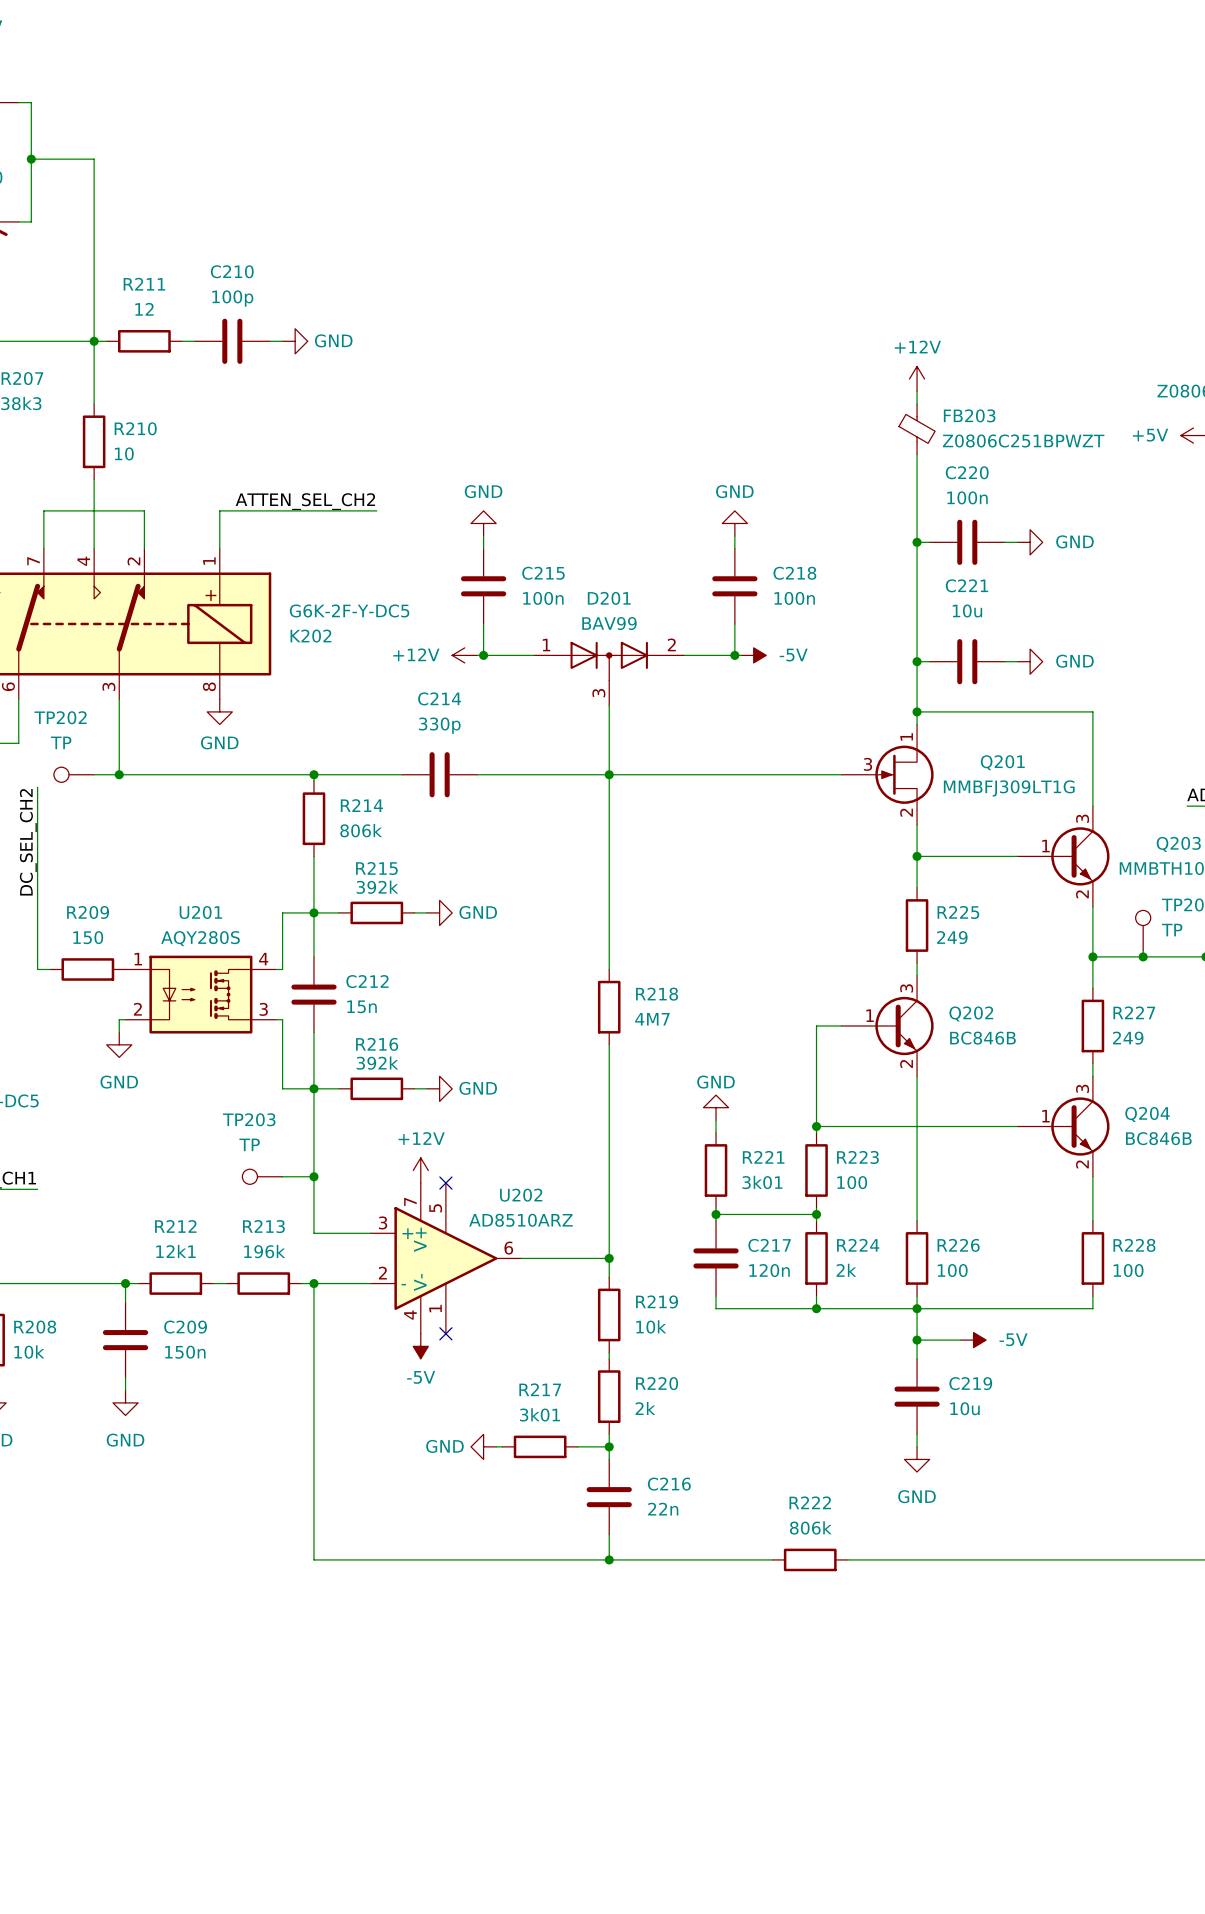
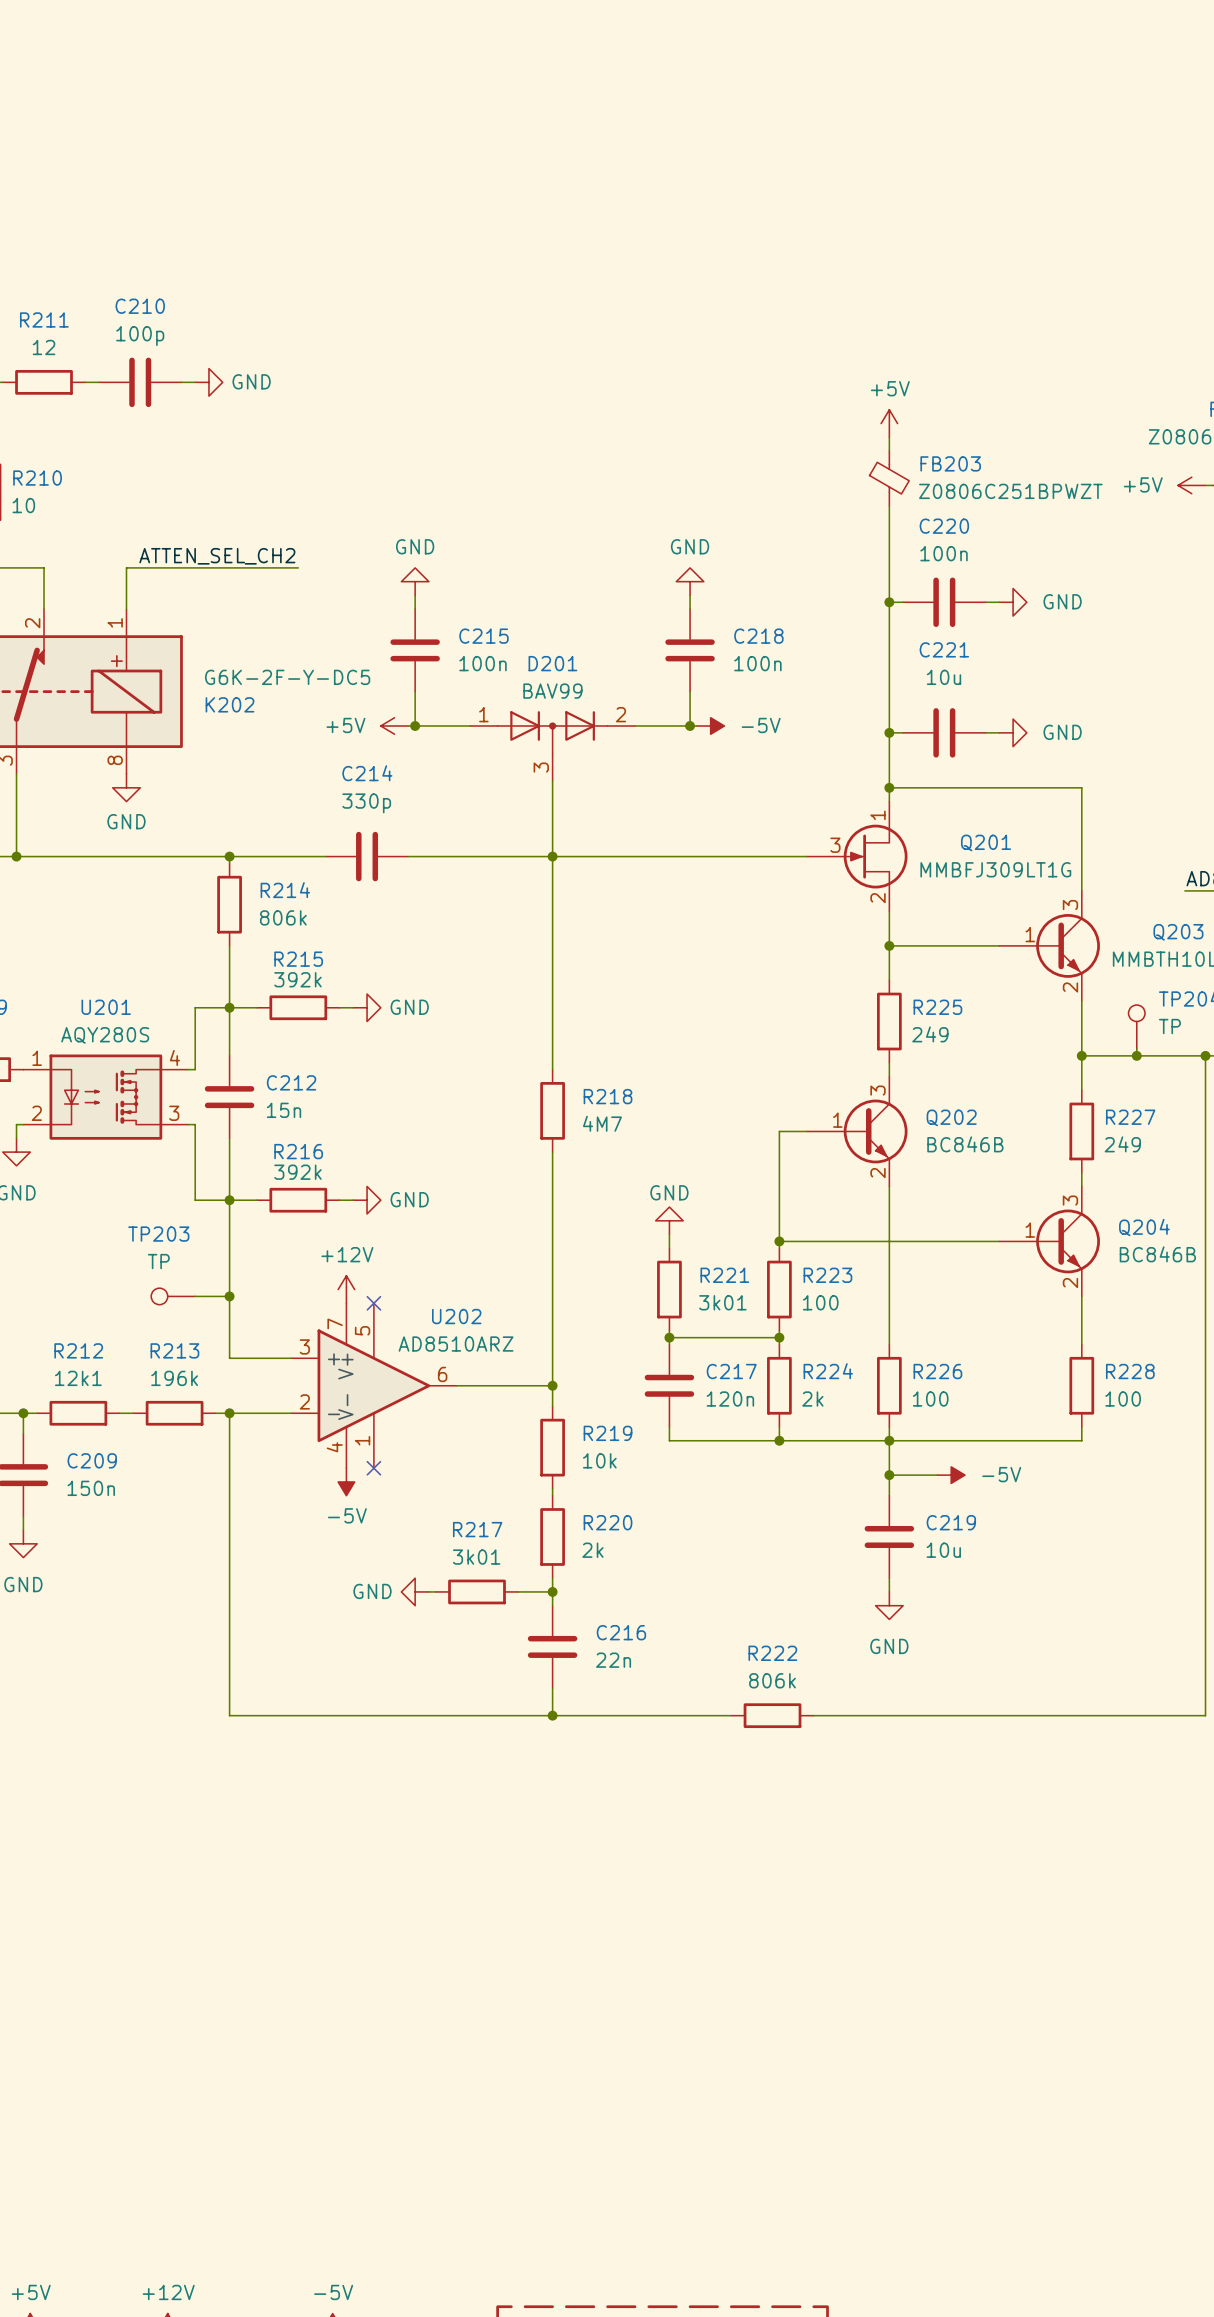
power symbol: +12V (917, 379) -> +5V (889, 423)
power symbol: +12V (464, 655) -> +5V (394, 725)

